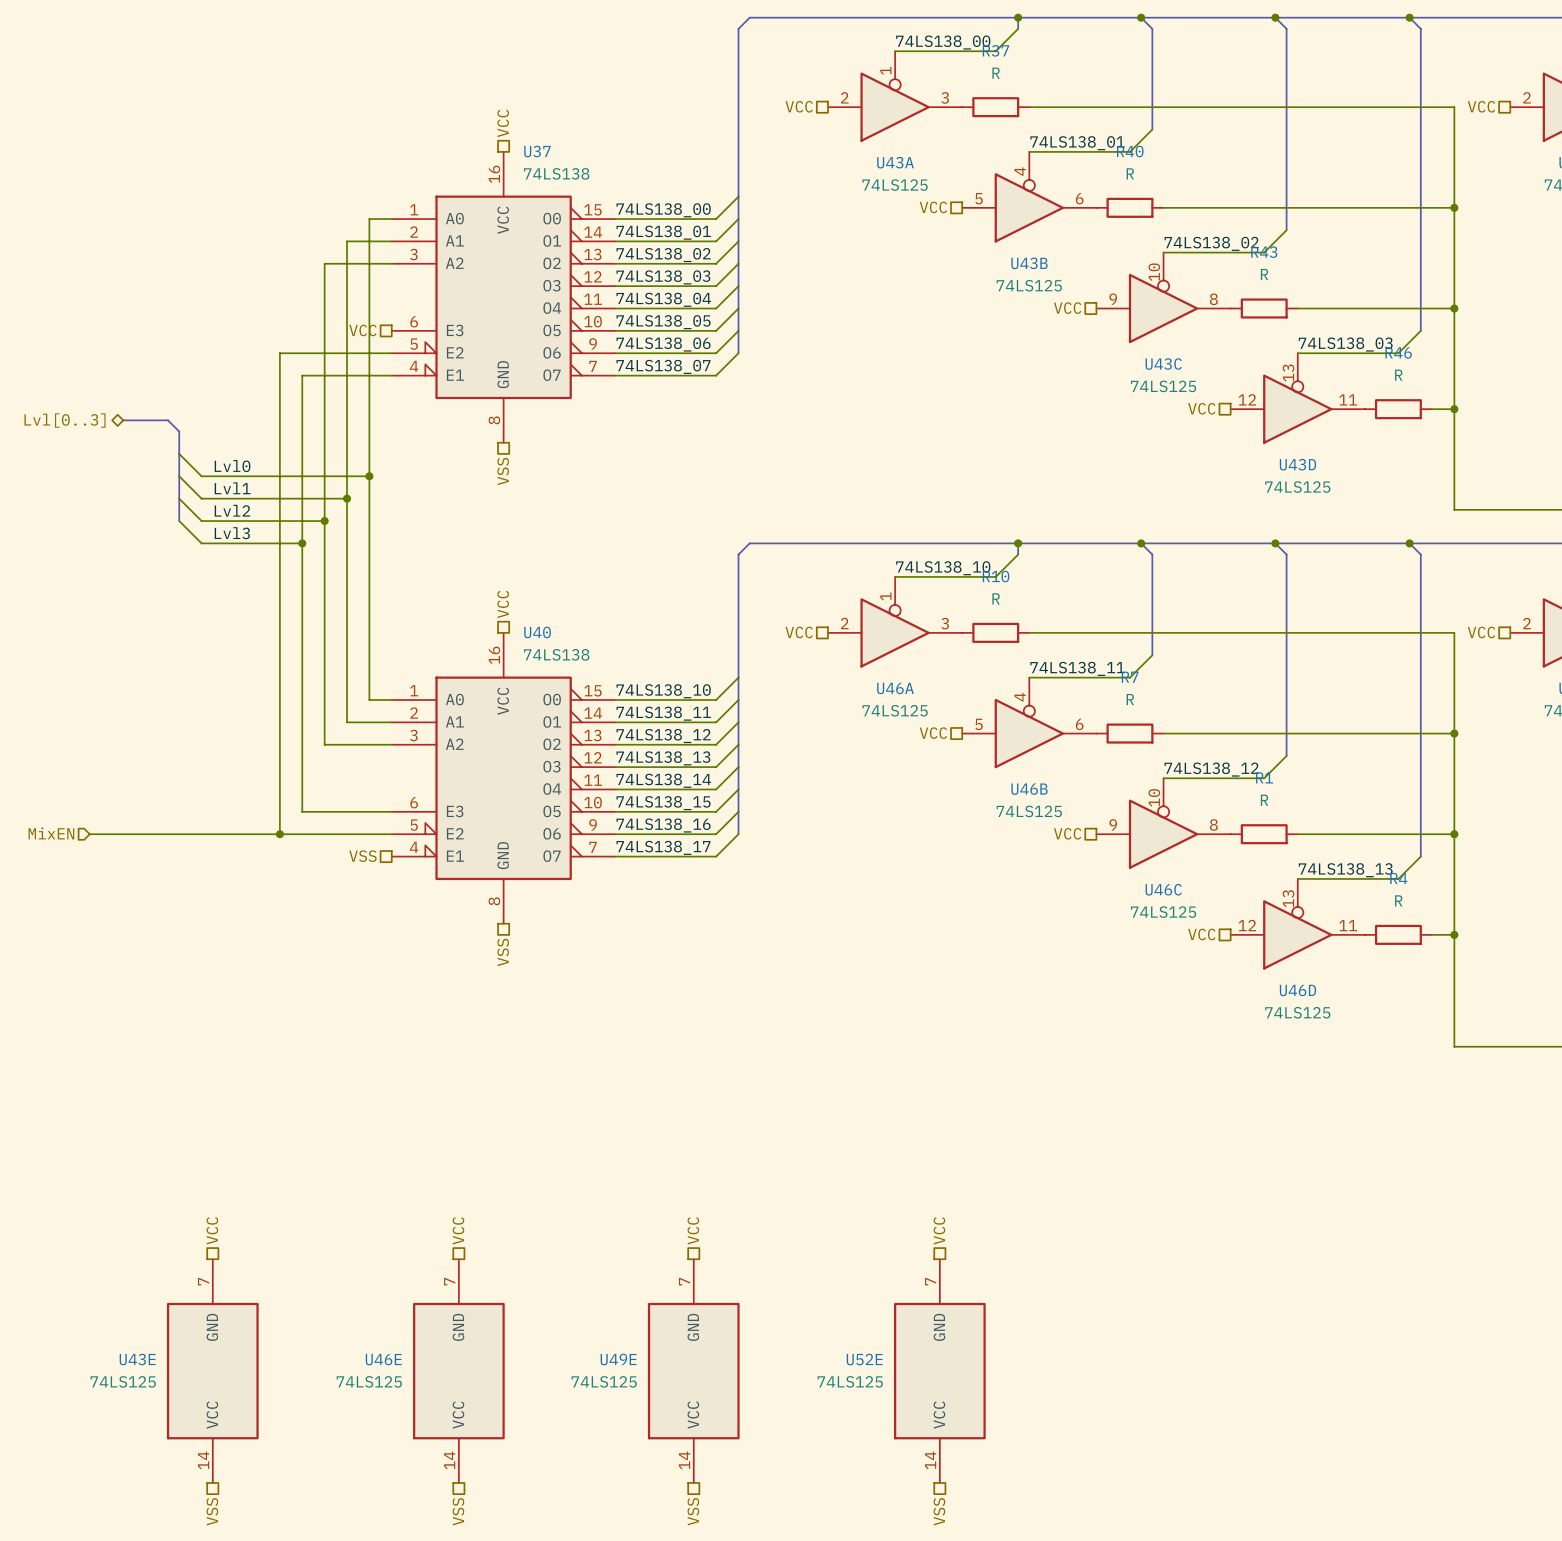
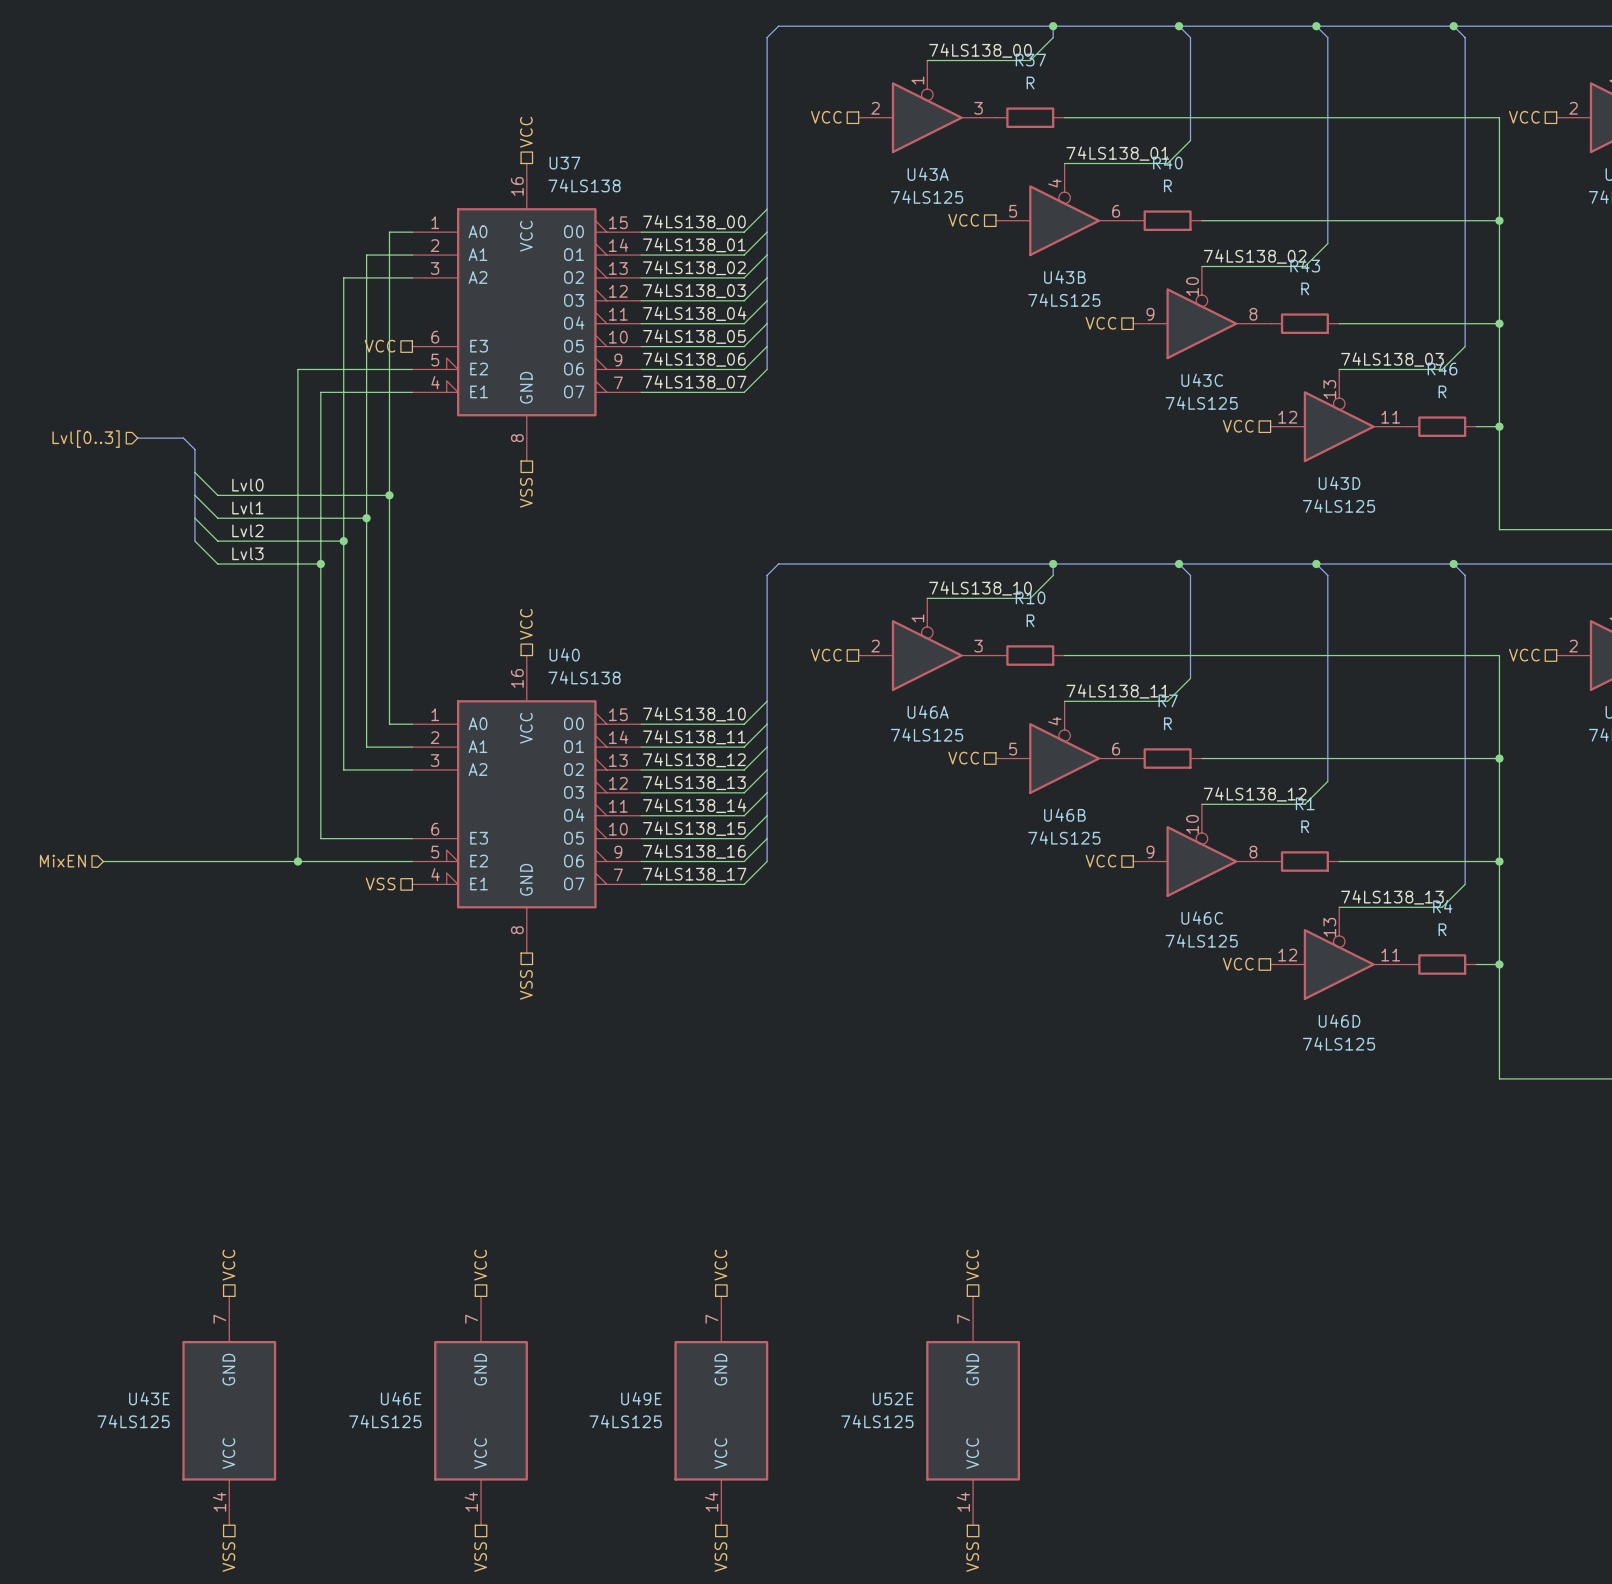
hierarchical label shape: bidirectional (65, 420) -> input (86, 439)

